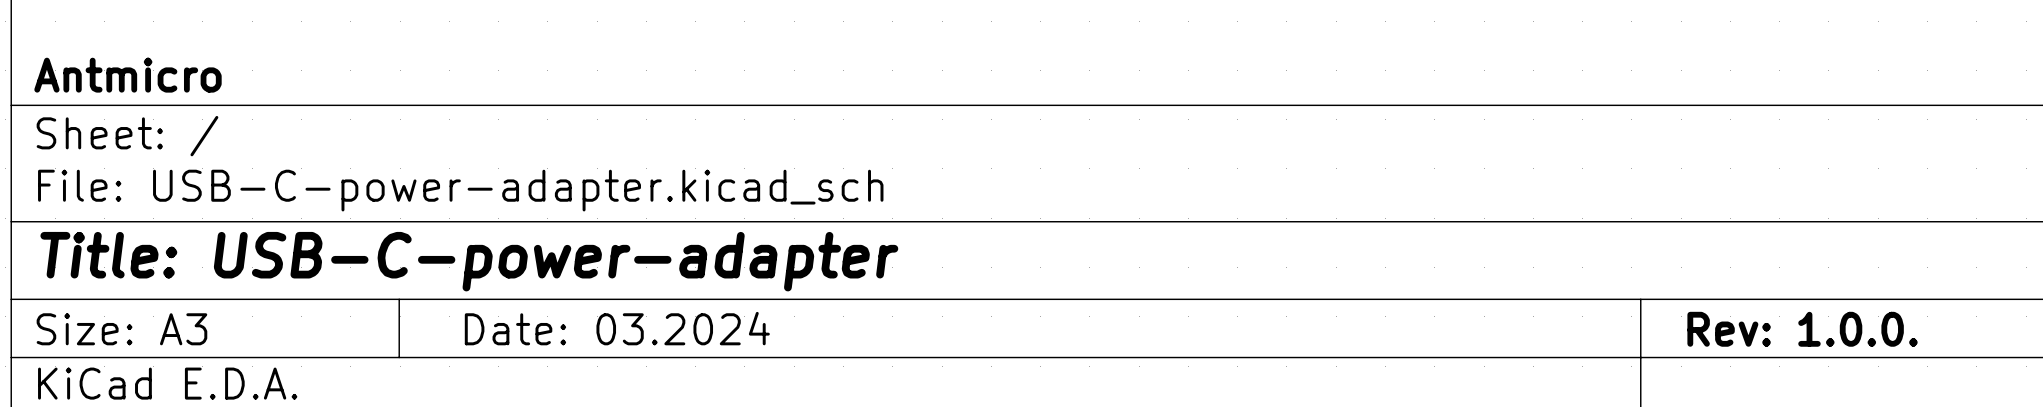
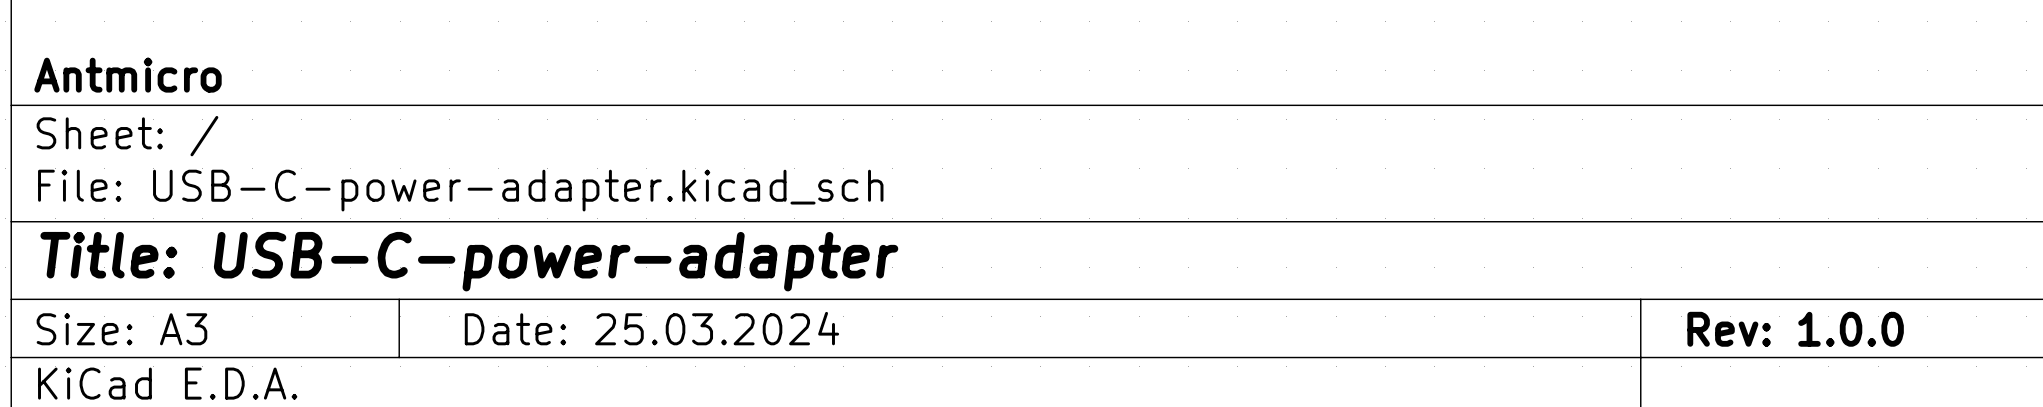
title block: Date: 03.2024 (617, 328) -> Date: 25.03.2024 (651, 328)
title block: Rev: 1.0.0. (1802, 329) -> Rev: 1.0.0 (1795, 329)

